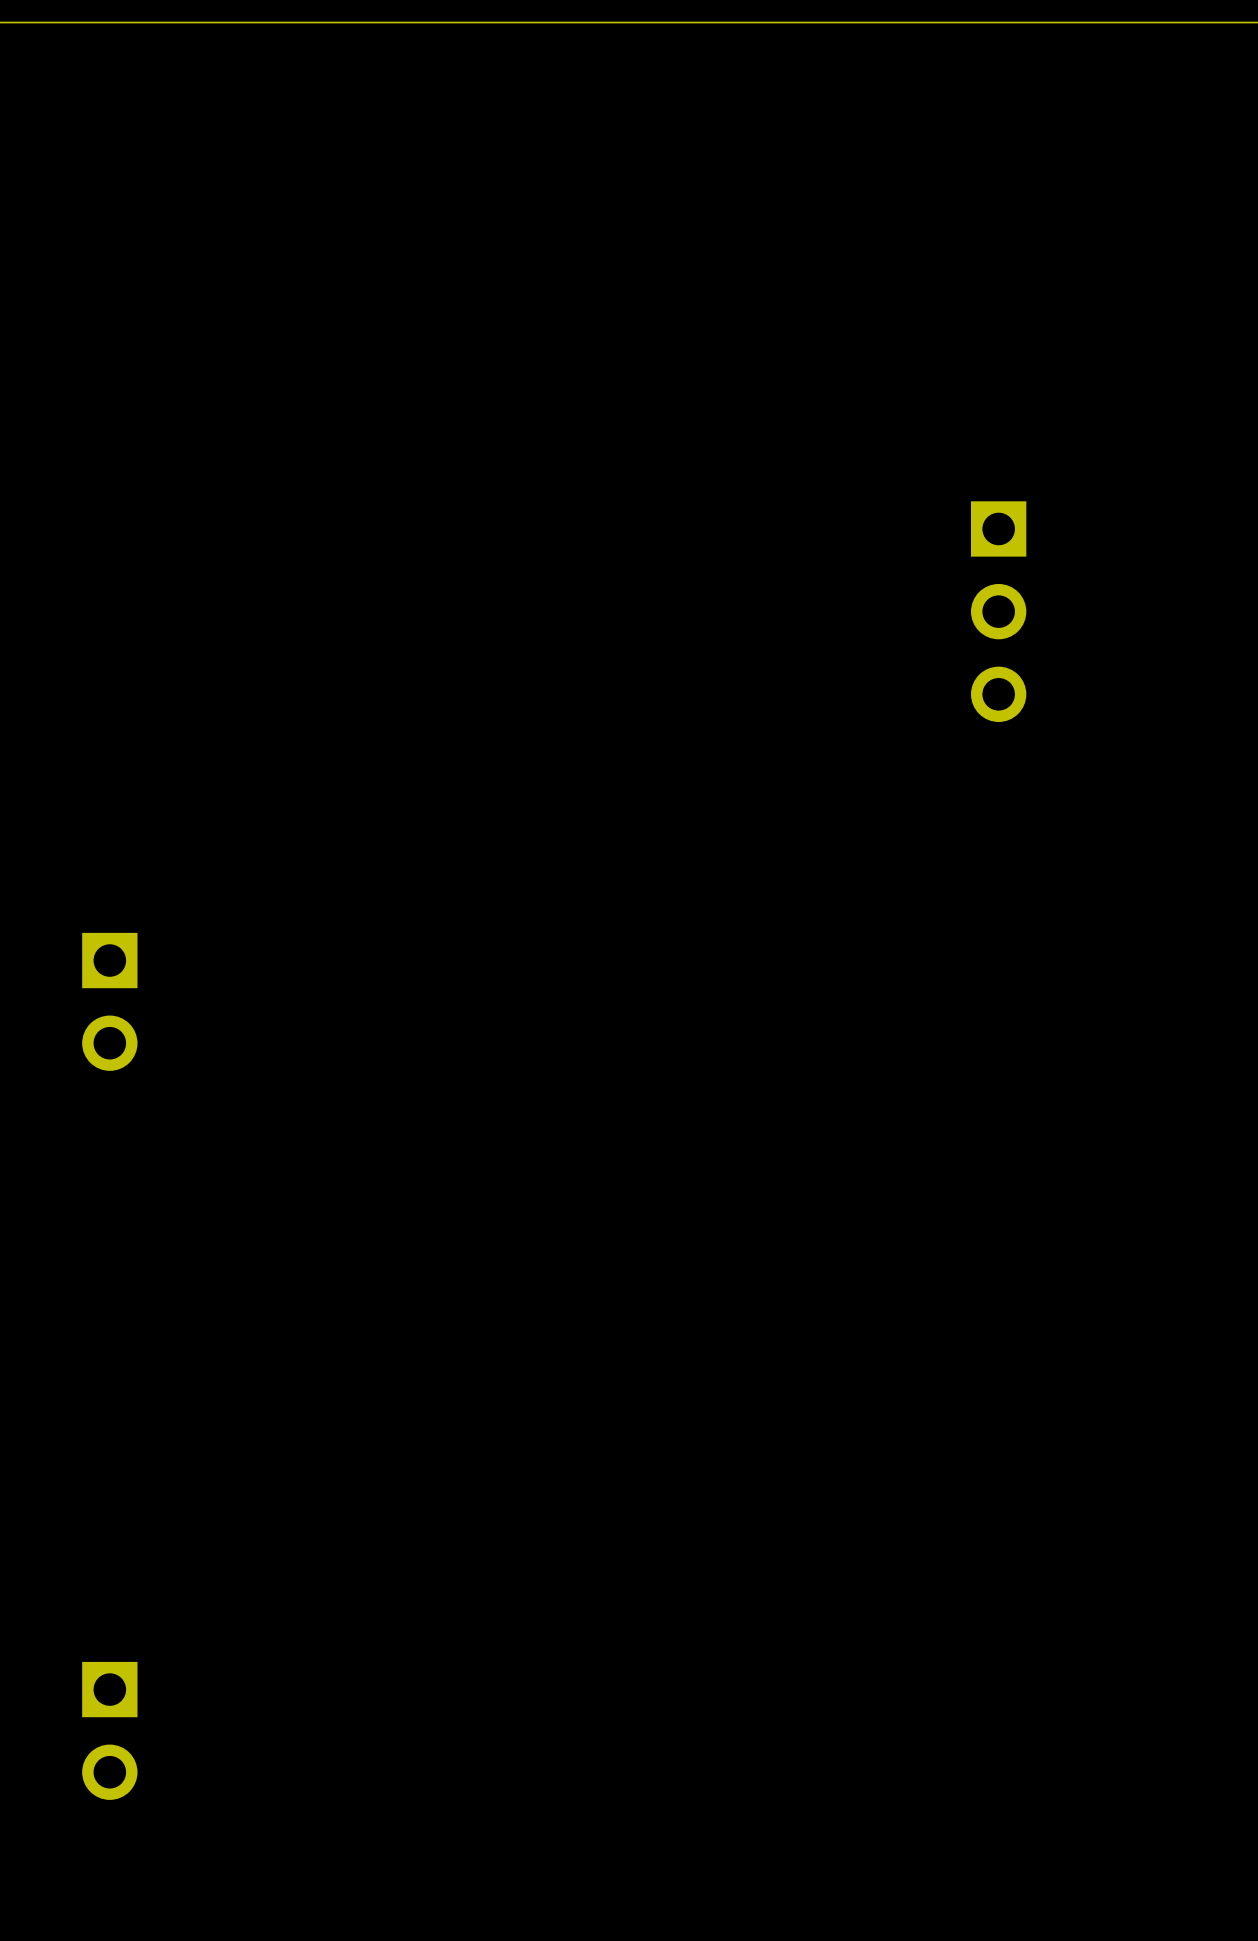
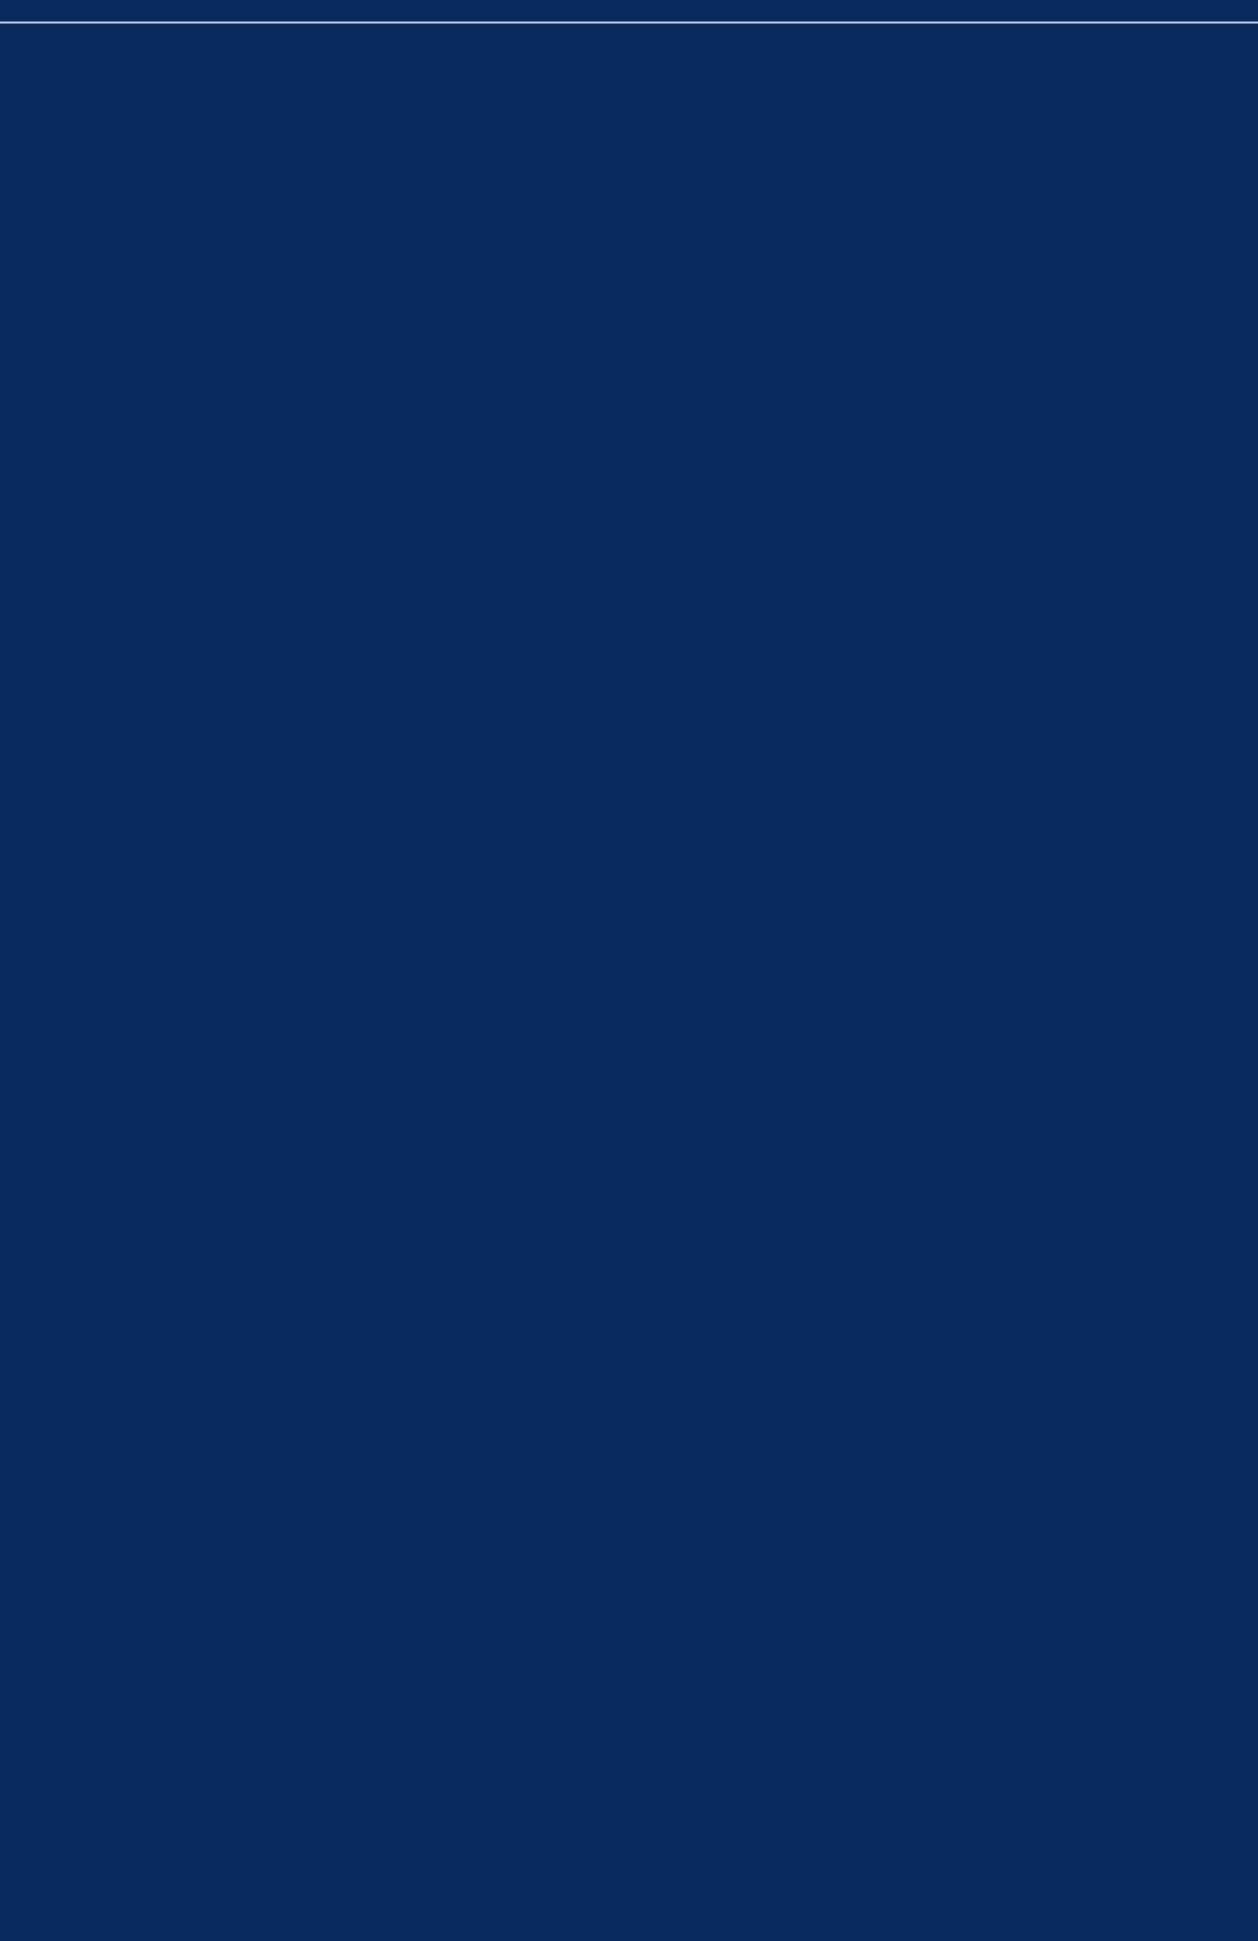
part: (998, 611) -> none
part: (109, 1001) -> none
part: (109, 1730) -> none

